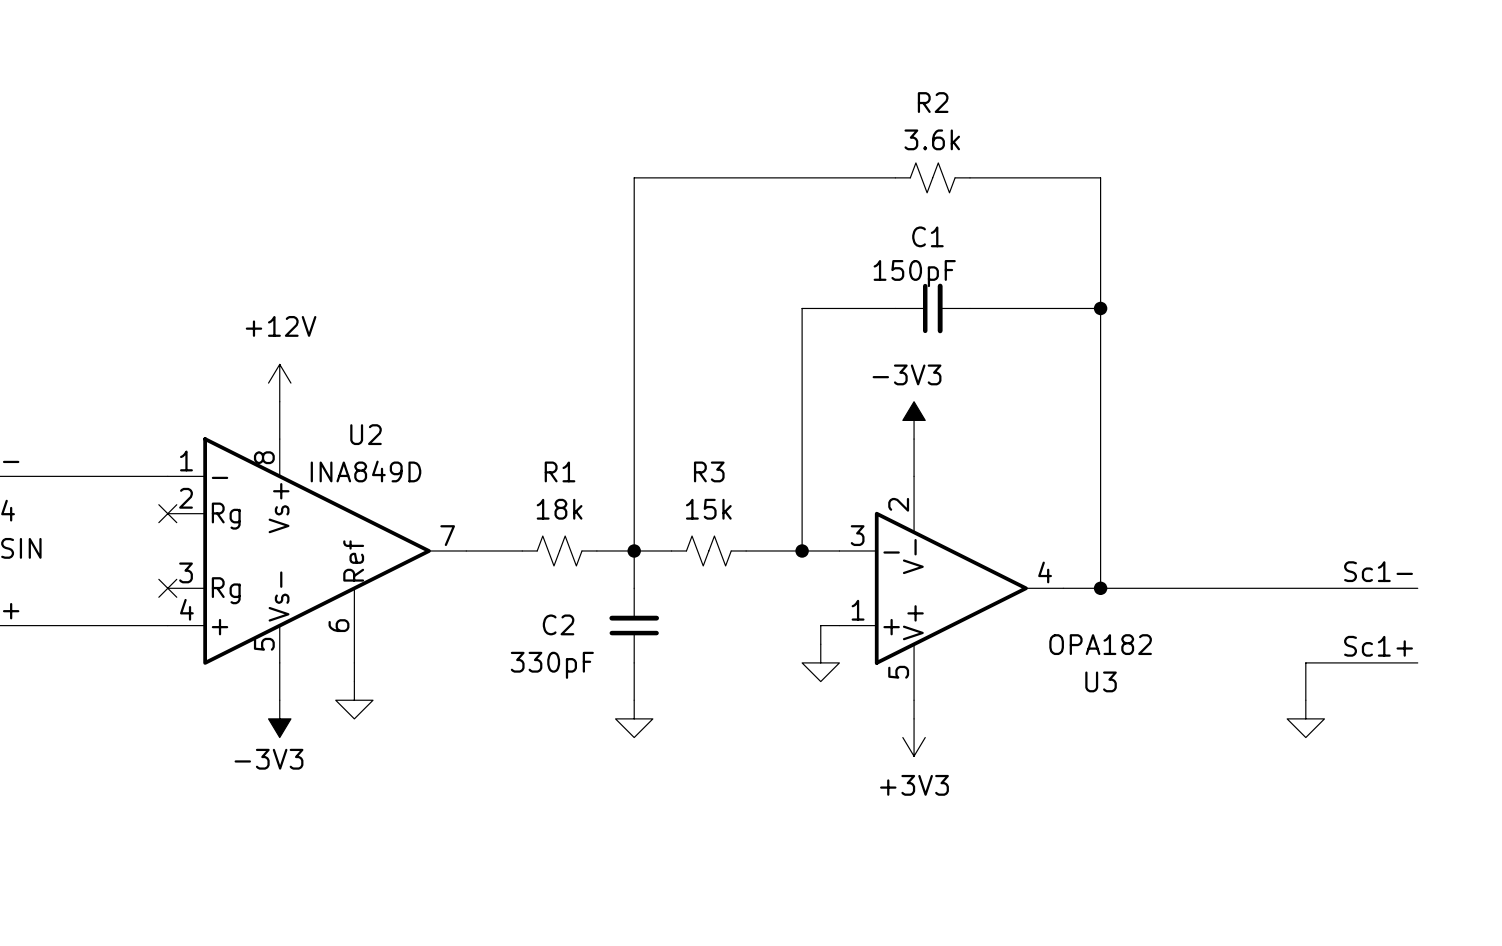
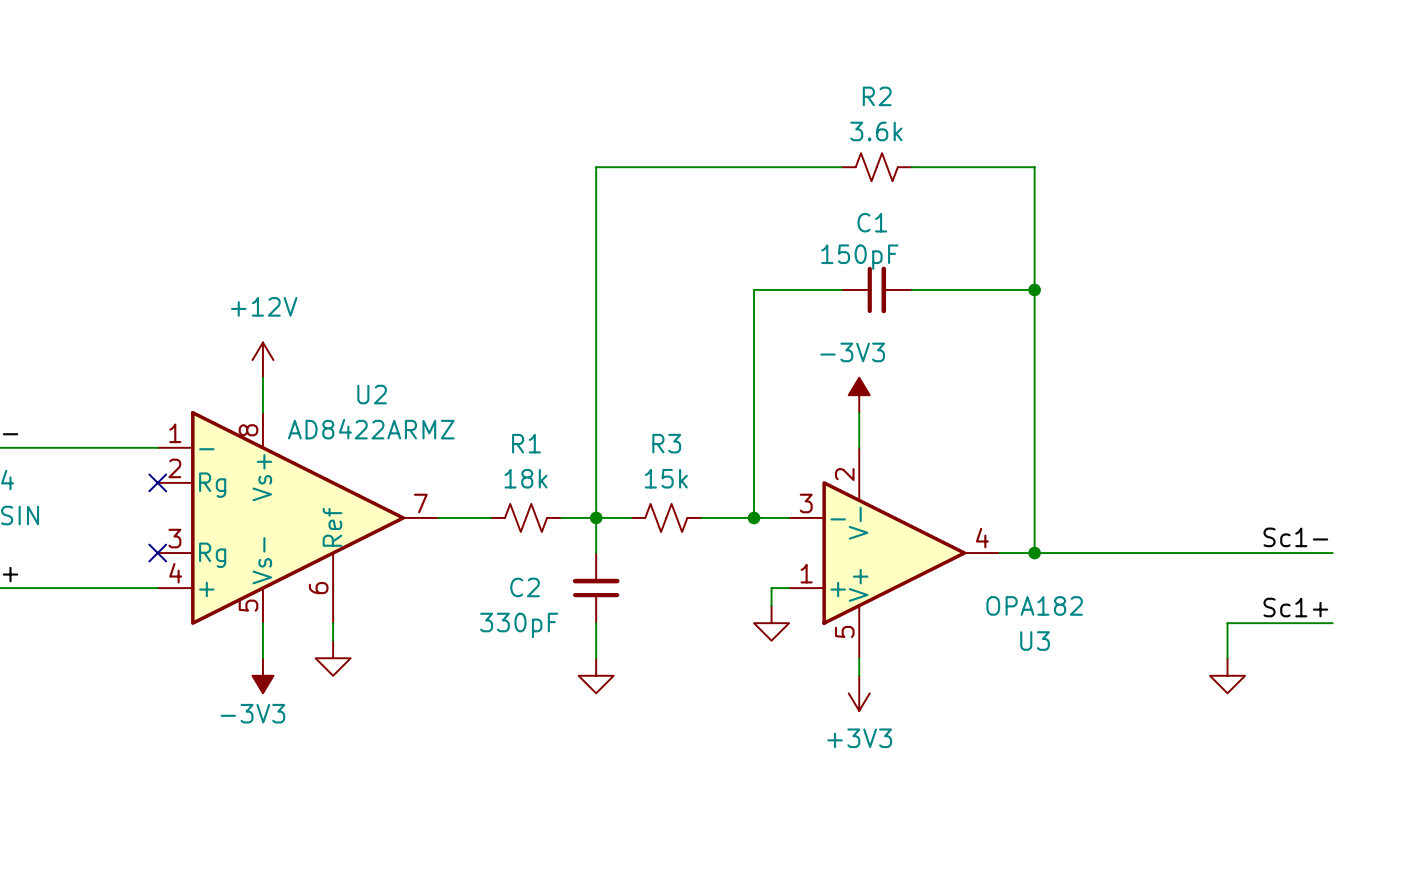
U2 name position: U2 (366, 434) -> U2 (372, 394)
U2 value: INA849D (366, 471) -> AD8422ARMZ (371, 429)

